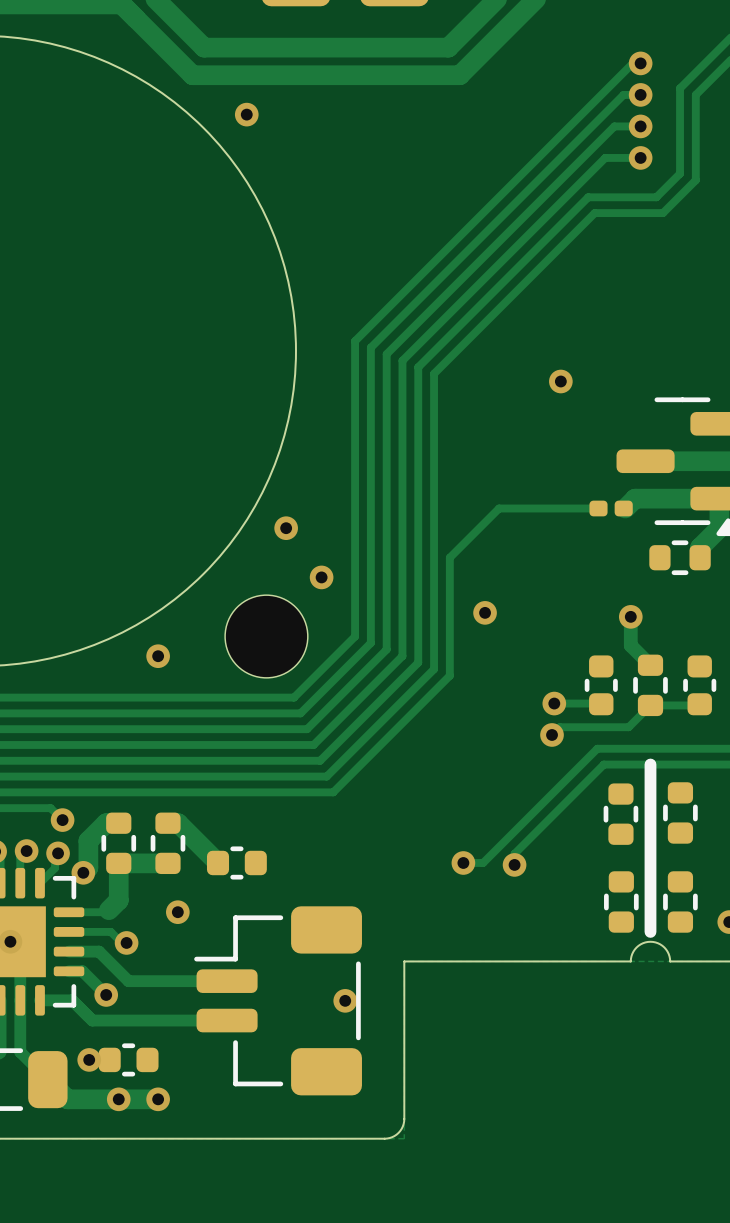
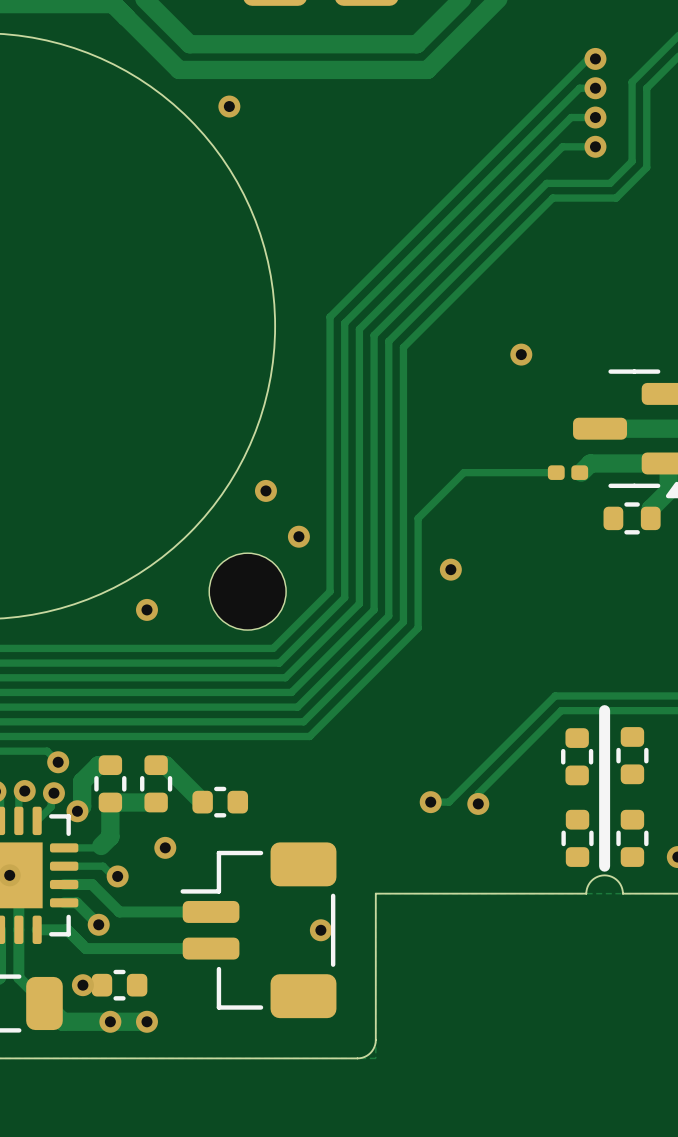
track: (630, 616) (630, 645) (650, 665) -> none
via: (630, 616) -> none
part: (601, 685) -> none
part: (650, 685) -> none
part: (699, 685) -> none
track: (554, 703) (601, 704) -> none
via: (554, 703) -> none
track: (699, 704) (650, 705) (628, 727) (559, 727) (552, 734) -> none
via: (552, 734) -> none

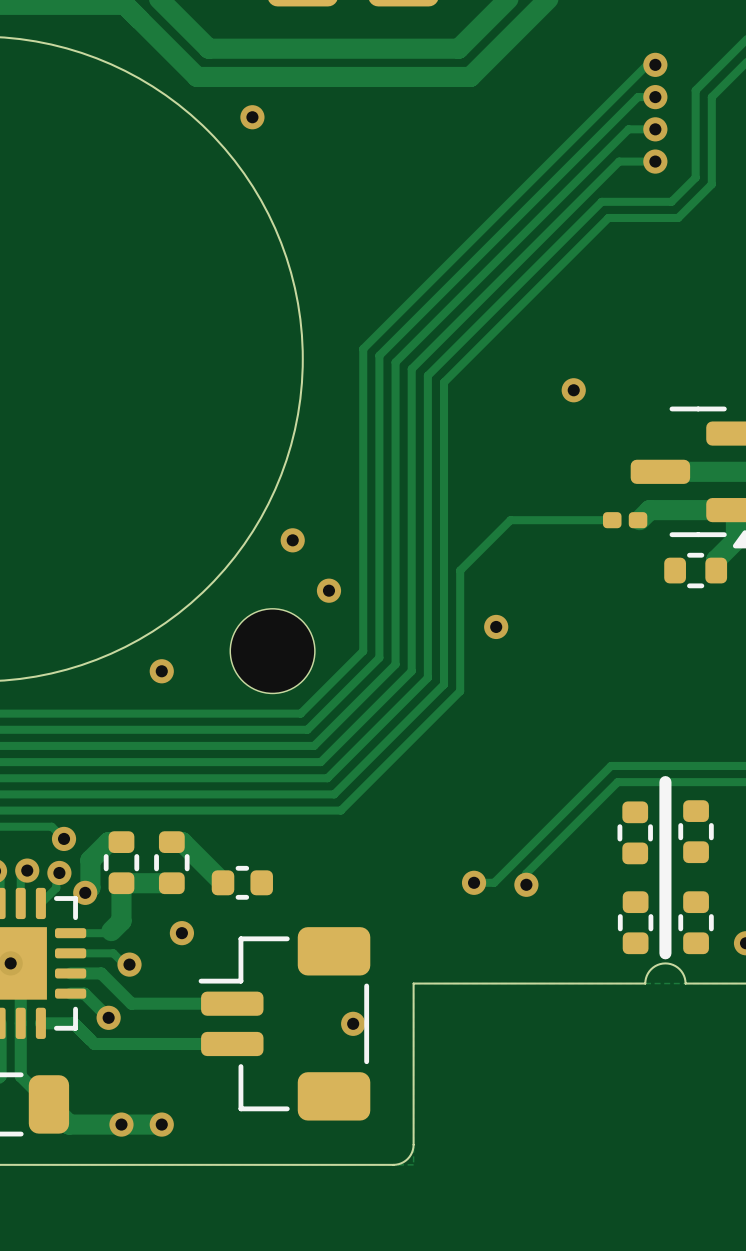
via: (82, 985) -> none
part: (119, 985) -> none

